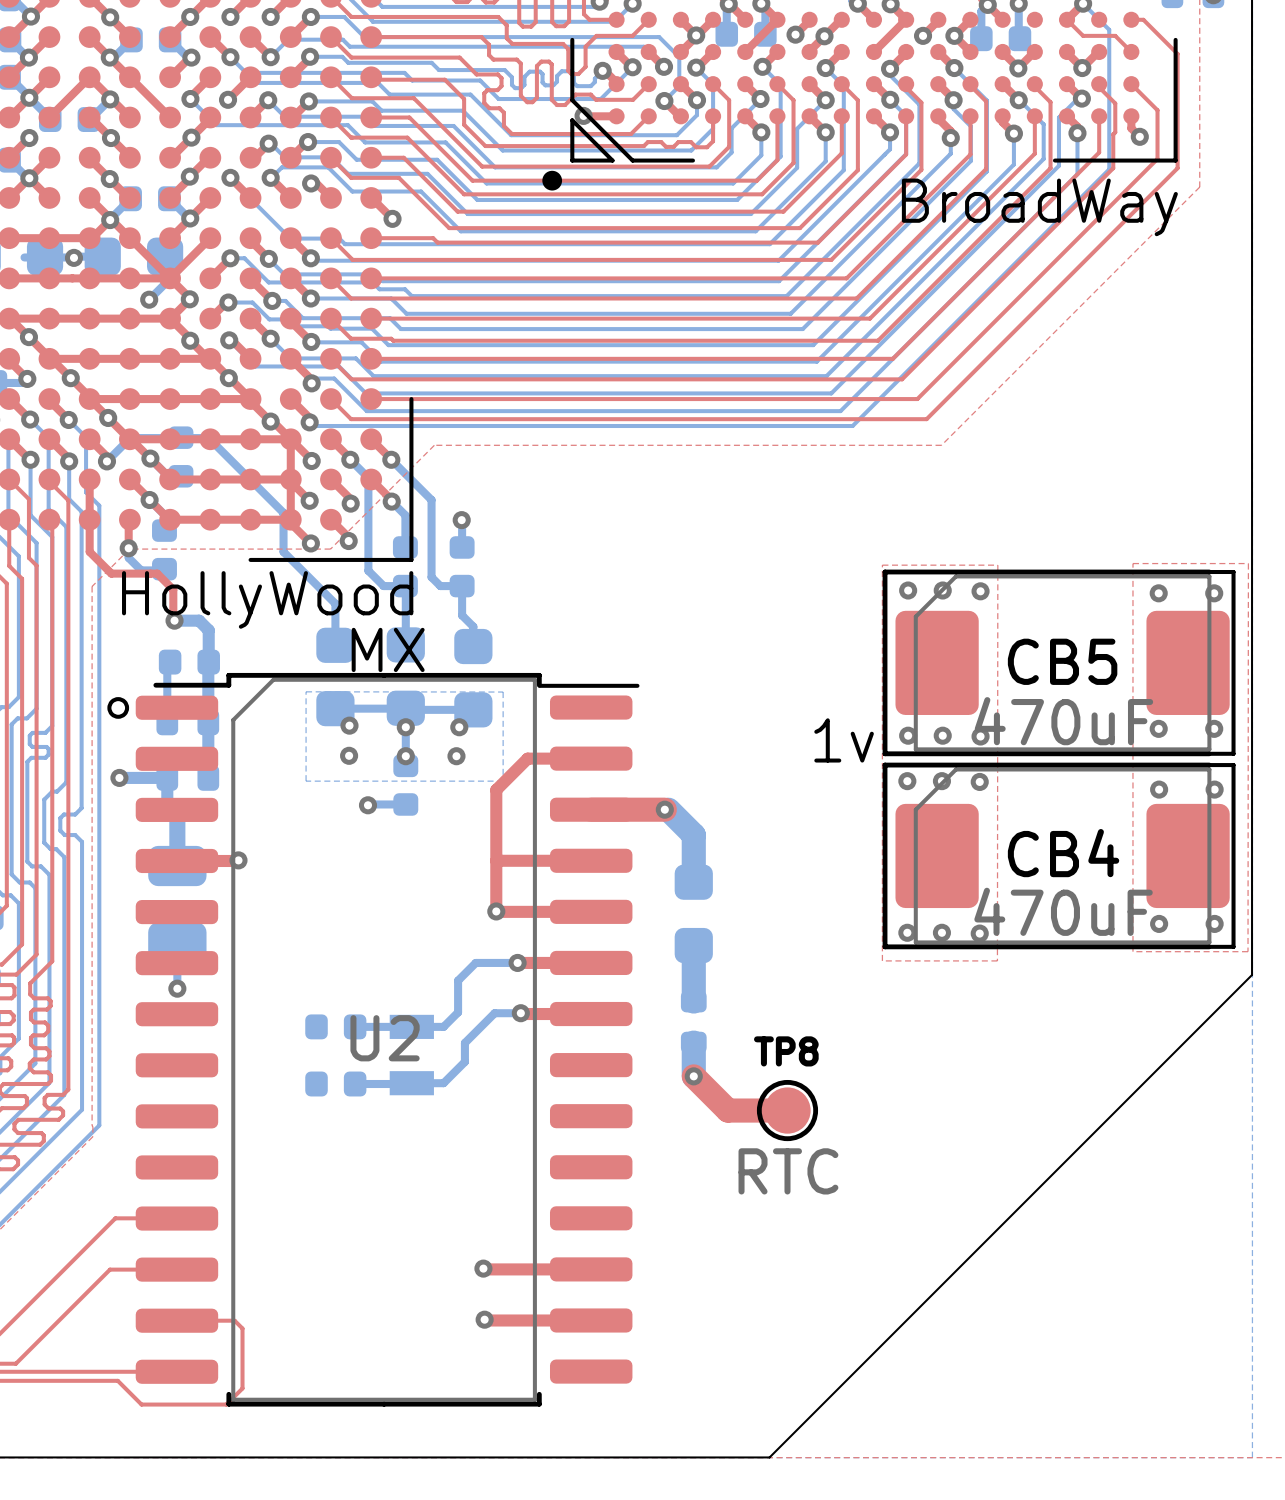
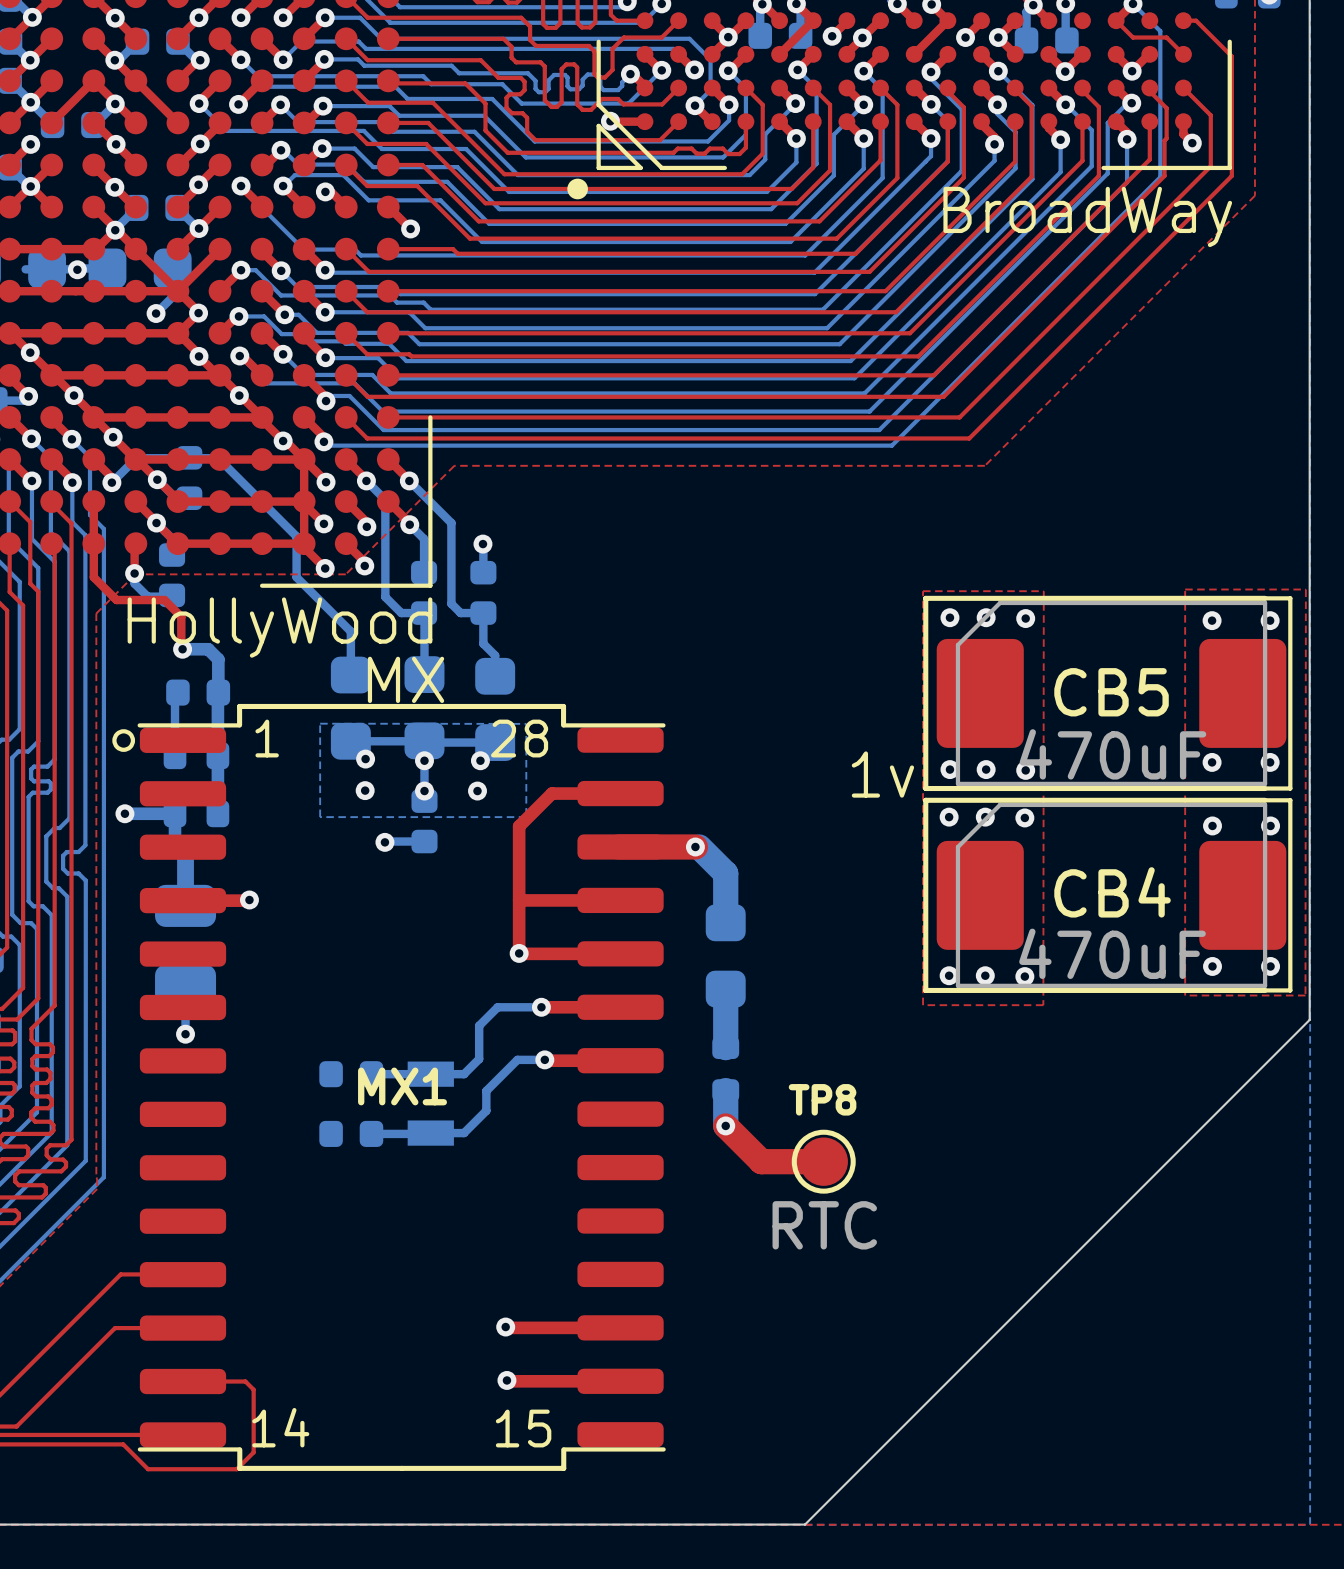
line: (539, 685) (637, 685) -> none
MX1: none -> (401, 1087)
U2: (384, 1039) -> none

